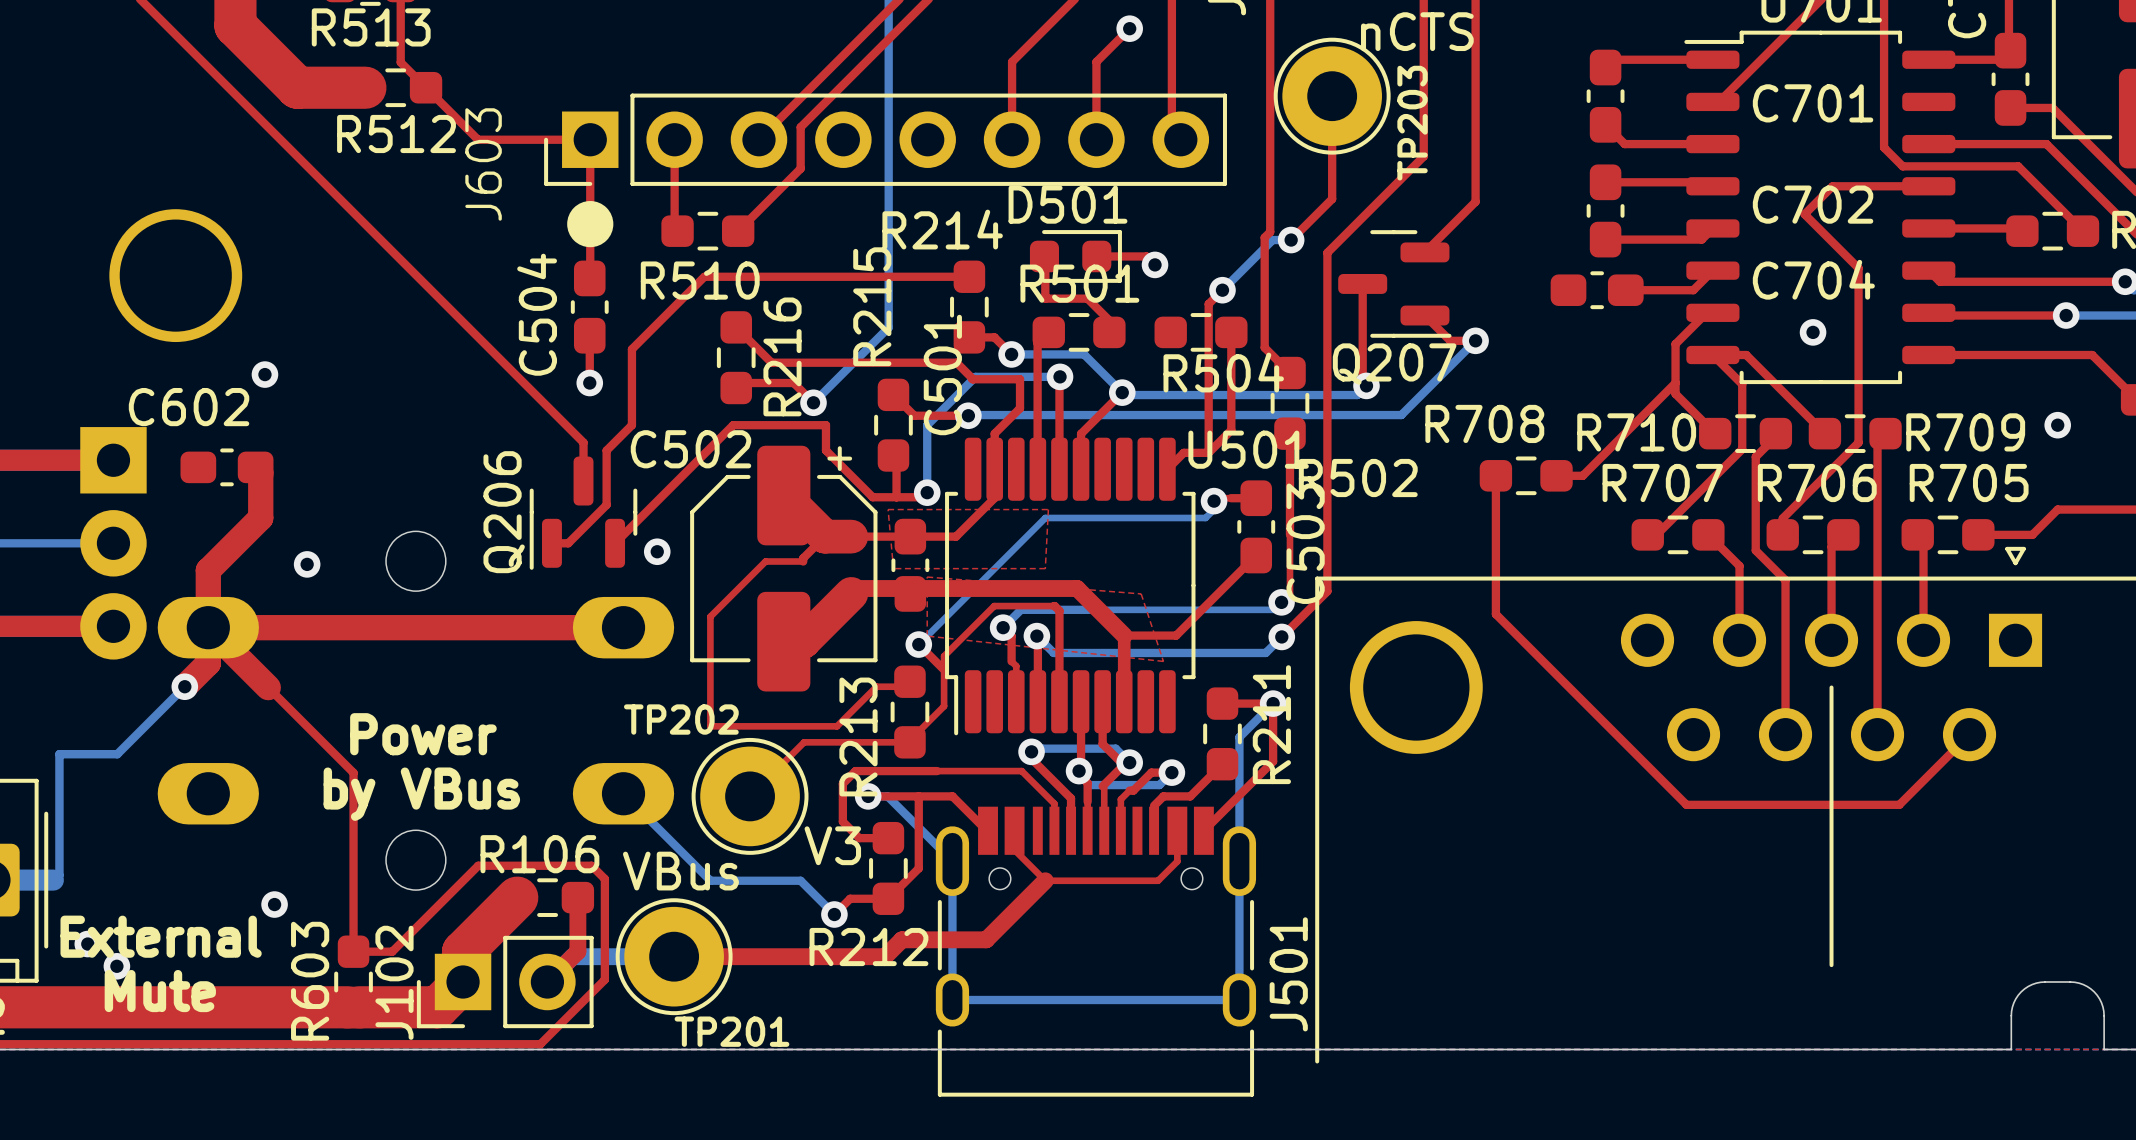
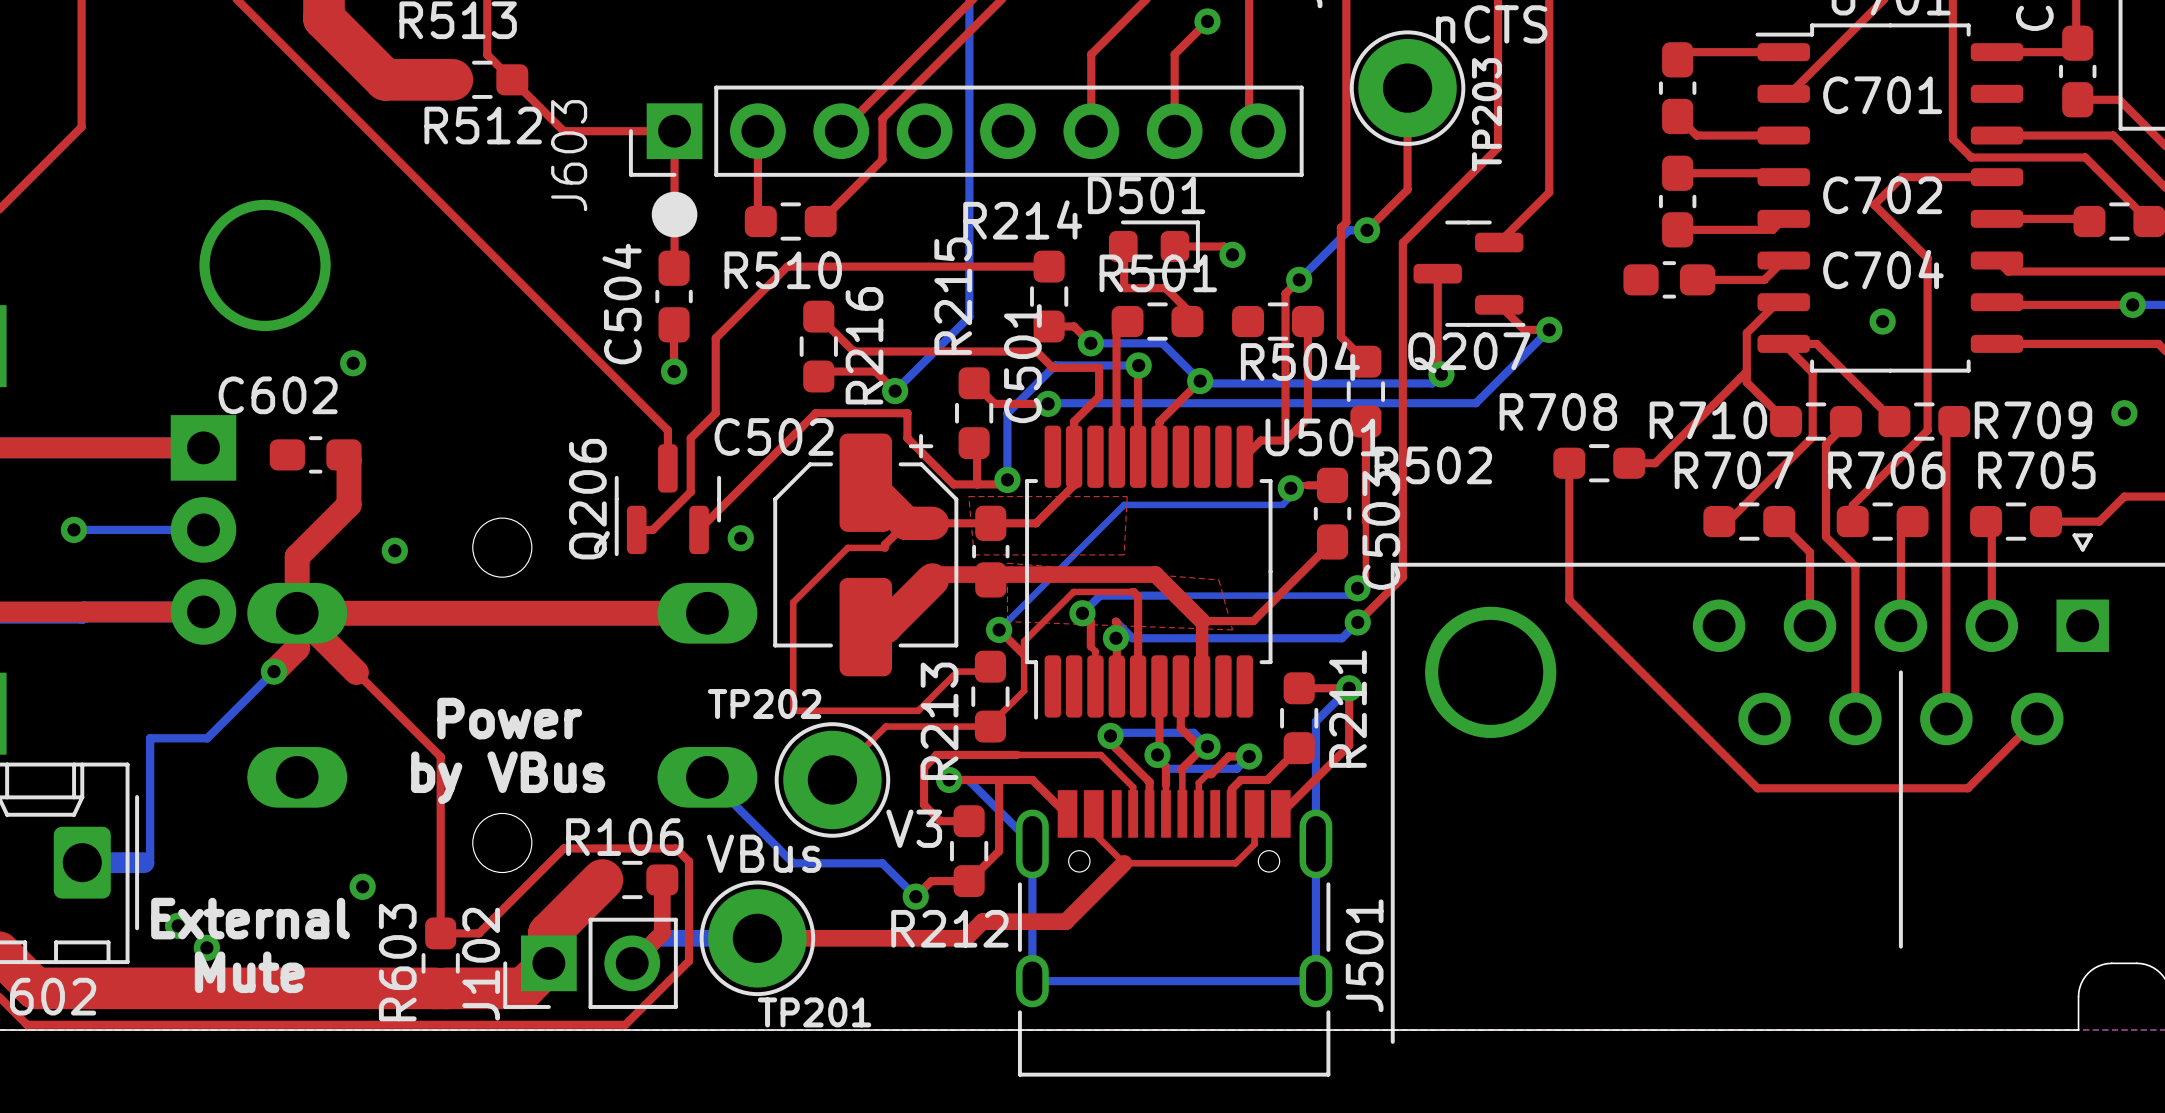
top zone outline: (1141, 593) (1163, 661) (927, 636) -> (1218, 579) (1232, 629) (1007, 621)
via position: (1036, 636) -> (1115, 638)

